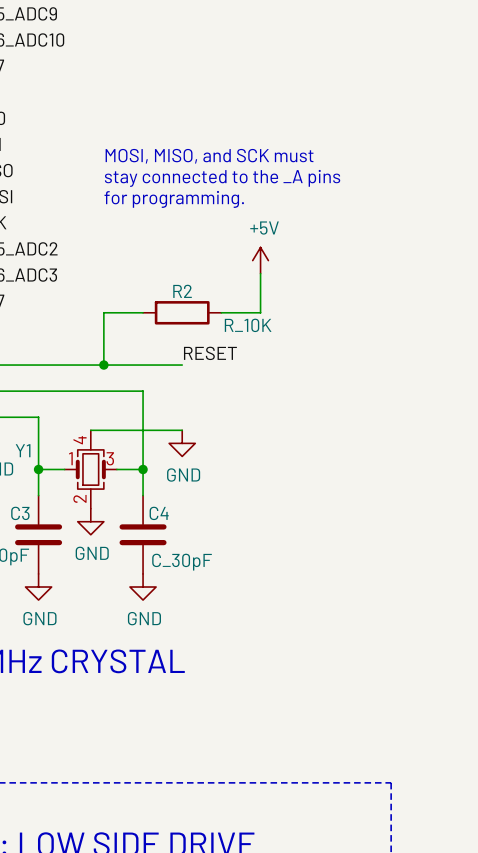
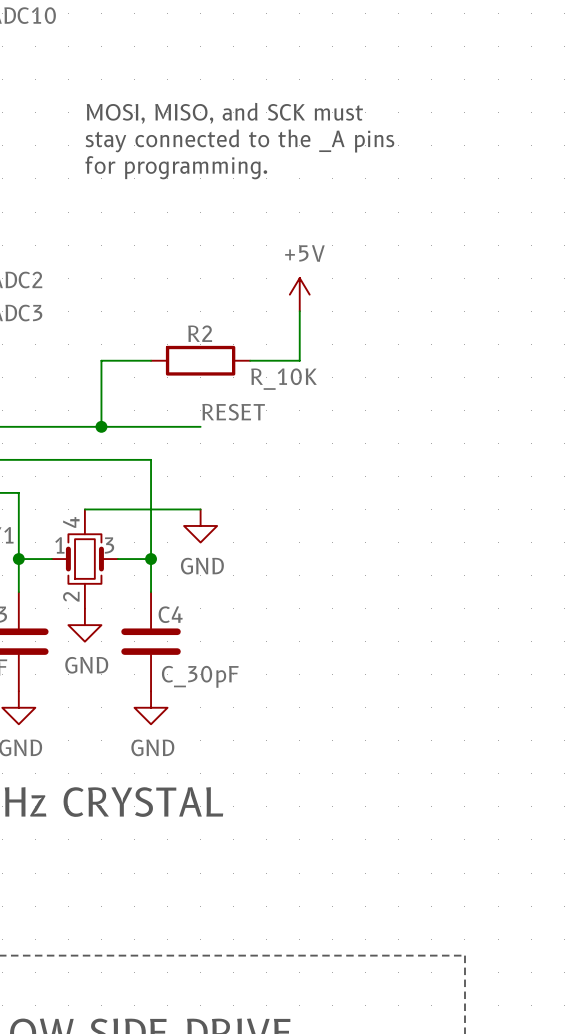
text position: MOSI, MISO, and SCK must (209, 156) -> MOSI, MISO, and SCK must (224, 113)
text position: stay connected to the _A pins (222, 178) -> stay connected to the _A pins (239, 141)
text position: for programming. (174, 199) -> for programming. (176, 167)

